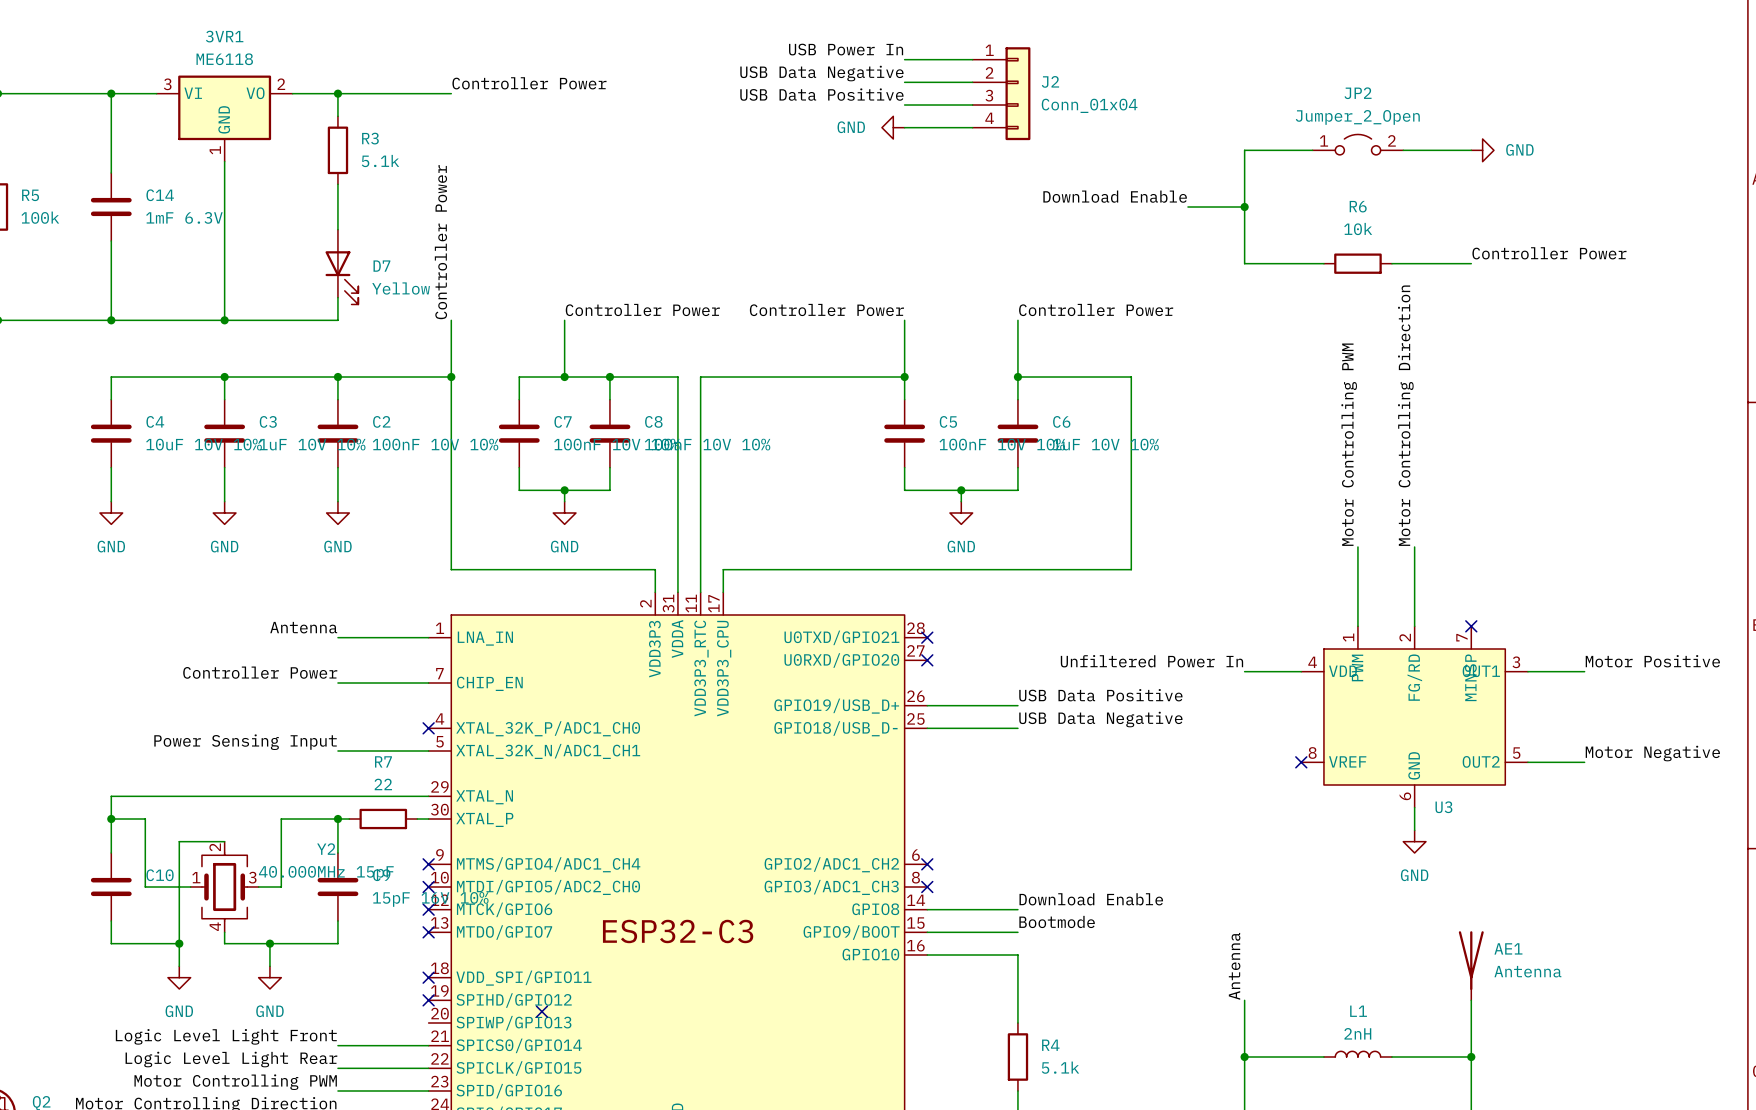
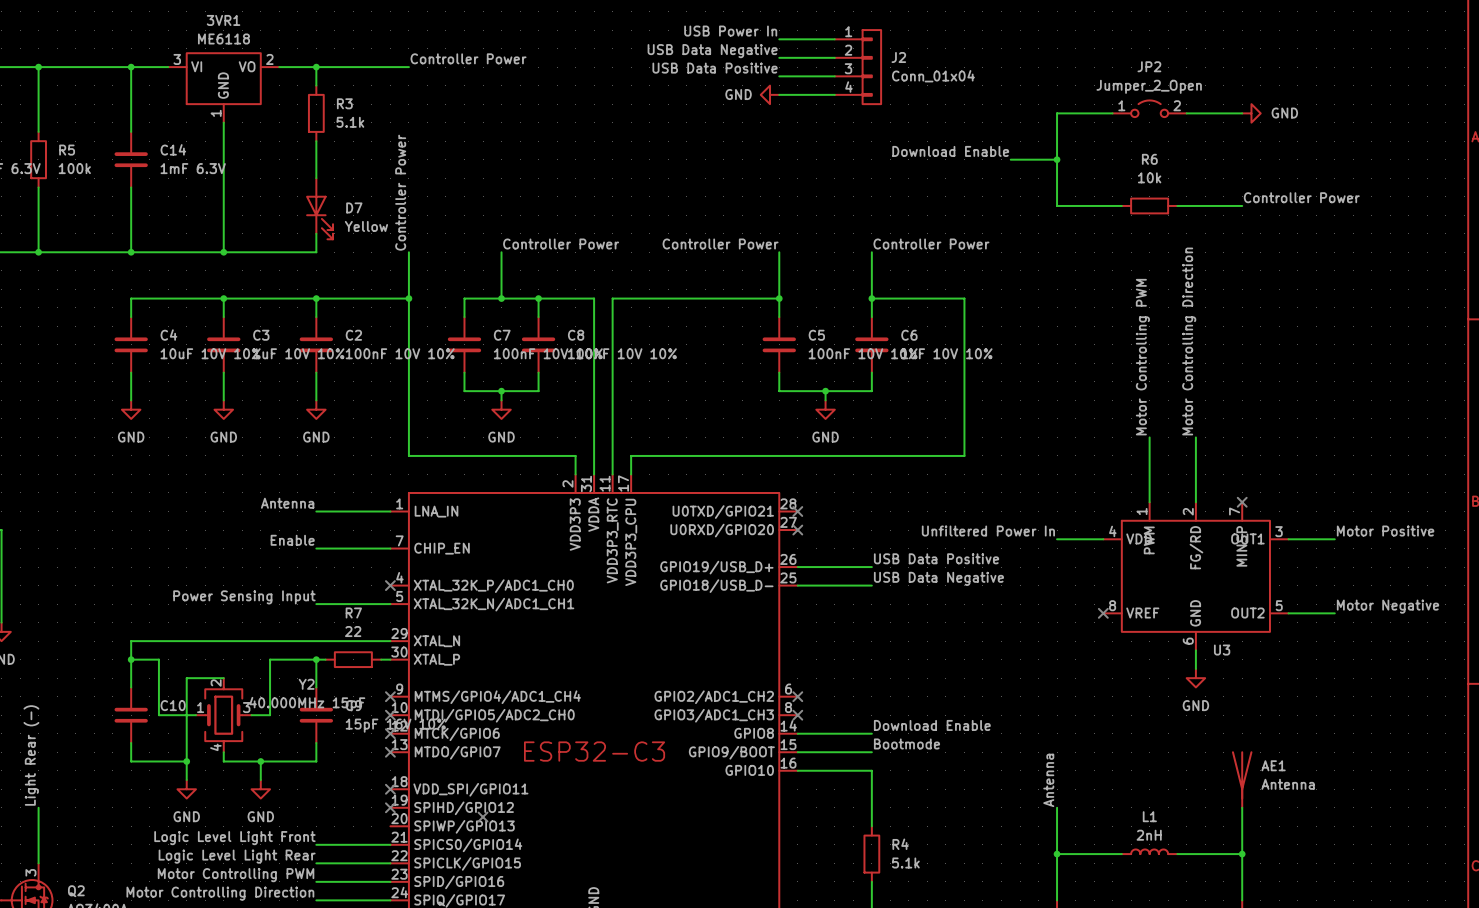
label: Controller Power (260, 672) -> Enable (292, 540)

